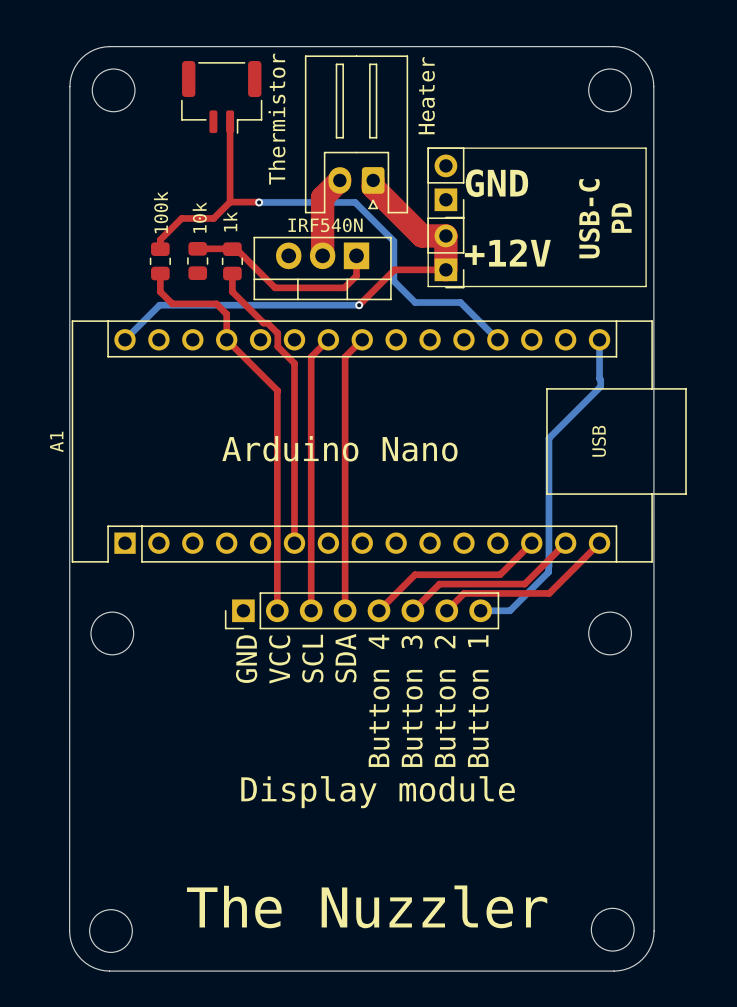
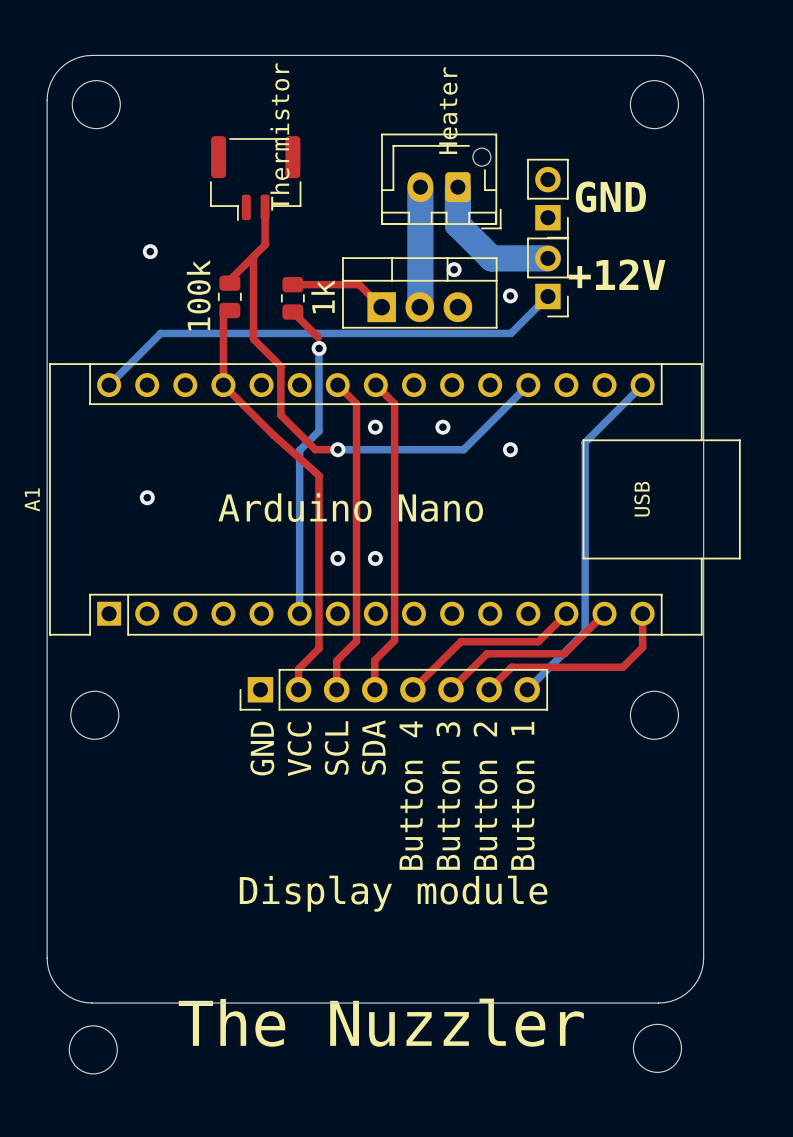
board edge: (69, 86) (69, 931) (72, 946) (81, 959) (94, 968) (109, 971) (614, 971) (634, 965) (648, 951) (654, 931) (653, 86) -> (47, 100) (47, 958) (50, 975) (60, 989) (74, 999) (92, 1003) (658, 1003) (670, 1001) (681, 997) (694, 985) (700, 975) (703, 958) (703, 100)
part: (221, 97) -> none
top track: (230, 121) (230, 202) -> none
part: (356, 134) -> none
line: (428, 148) (646, 148) (646, 286) (428, 286) (428, 148) -> none
part: none -> (255, 178)
part: none -> (441, 181)
bottom track: none -> (420, 187) (419, 307)
bottom track: none -> (457, 187) (457, 224) (491, 258) (547, 258)
part: none -> (547, 198)
top track: (339, 180) (322, 197) (322, 255) -> none
top track: (373, 180) (373, 187) (422, 235) (445, 235) (445, 269) (394, 269) (359, 305) -> none
top track: none -> (265, 207) (265, 244) (225, 284)
part: (445, 182) -> none
text position: GND (496, 183) -> GND (610, 196)
top track: (230, 202) (213, 218) (181, 218) (160, 239) (160, 249) -> none
top track: (230, 202) (259, 202) -> none
bottom track: (259, 202) (355, 202) (393, 241) (393, 281) (415, 302) (460, 302) (497, 339) -> (337, 449) (463, 449) (528, 385)
via: (259, 202) -> none
text: USB-C (589, 218) -> none
text: PD (621, 218) -> none
via: none -> (150, 251)
part value: 1k (230, 221) -> 100k (198, 295)
via: none -> (454, 269)
part: none -> (547, 277)
top track: (197, 248) (236, 249) (275, 287) (344, 287) (356, 275) (356, 255) -> none
top track: none -> (292, 284) (359, 284) (381, 307)
part: (445, 252) -> none
text position: +12V (507, 252) -> +12V (617, 274)
part: none -> (419, 292)
via: none -> (510, 295)
part: 100k (160, 261) -> none
part: 10k (197, 261) -> none
part: none -> 1k (292, 298)
part: IRF540N (322, 268) -> none
top track: (160, 273) (160, 291) (172, 303) (216, 303) (226, 314) -> (225, 312) (223, 313) (223, 356)
top track: (232, 273) (232, 291) (263, 323) (267, 323) (277, 333) -> (253, 256) (253, 339) (280, 366) (280, 377)
top track: none -> (292, 312) (318, 337)
bottom track: (159, 305) (359, 305) -> (148, 346) (160, 333) (511, 333) (547, 296)
via: (359, 305) -> none
bottom track: none -> (319, 348) (319, 431) (299, 450) (299, 613)
via: none -> (319, 348)
top track: (328, 339) (311, 356) (311, 610) -> (337, 385) (356, 403) (356, 641) (336, 660) (336, 689)
top track: (362, 339) (345, 356) (345, 610) -> (375, 385) (394, 403) (394, 640) (374, 660) (374, 689)
bottom track: (599, 339) (600, 386) (548, 438) (548, 572) (509, 610) (480, 610) -> (642, 385) (585, 442) (585, 631) (527, 689)
top track: (277, 346) (294, 363) (294, 543) -> (280, 392) (280, 415) (315, 449) (337, 449)
via: none -> (375, 427)
via: none -> (442, 427)
top track: (270, 383) (277, 390) (277, 610) -> (273, 434) (319, 475) (319, 648) (298, 669) (298, 689)
via: none -> (337, 449)
via: none -> (510, 449)
via: none -> (147, 497)
via: none -> (337, 558)
via: none -> (375, 558)
top track: (599, 543) (549, 593) (464, 593) (446, 610) -> (642, 613) (642, 647) (622, 667) (511, 667) (489, 689)
top track: (506, 568) (500, 574) (415, 574) (379, 610) -> (538, 641) (460, 641) (412, 689)
top track: (530, 578) (524, 584) (439, 584) (412, 610) -> (564, 653) (487, 653) (451, 689)
part position: (362, 610) -> (393, 689)
text position: SCL (312, 658) -> SCL (336, 748)
text position: SDA (345, 658) -> SDA (373, 747)
text position: GND (246, 659) -> GND (262, 748)
text position: VCC (279, 659) -> VCC (299, 749)
text position: Button 4 (379, 700) -> Button 4 (411, 795)
text position: Button 3 (412, 701) -> Button 3 (448, 796)
text position: Button 2 (445, 701) -> Button 2 (485, 796)
text position: Button 1 (478, 701) -> Button 1 (522, 795)

